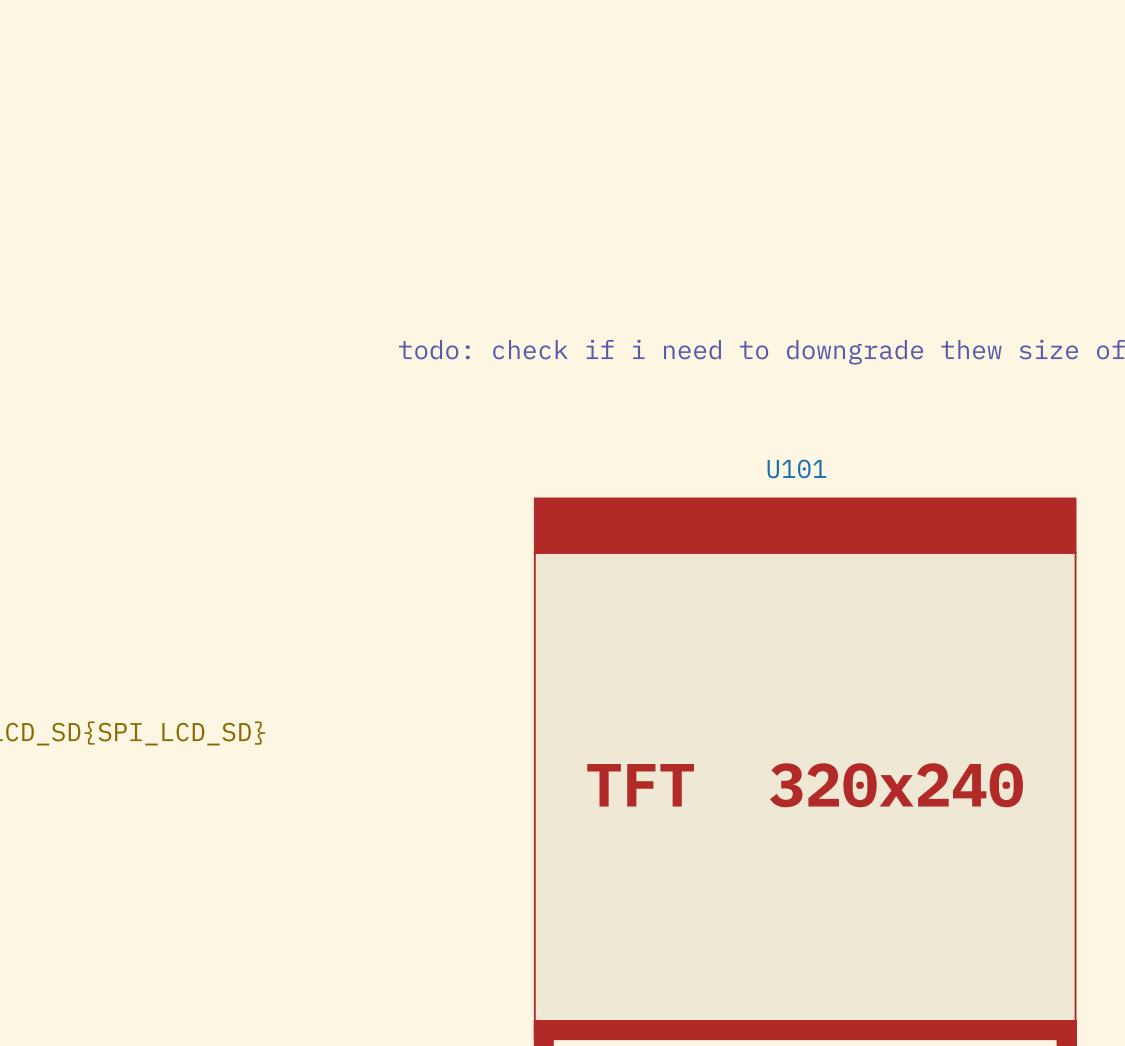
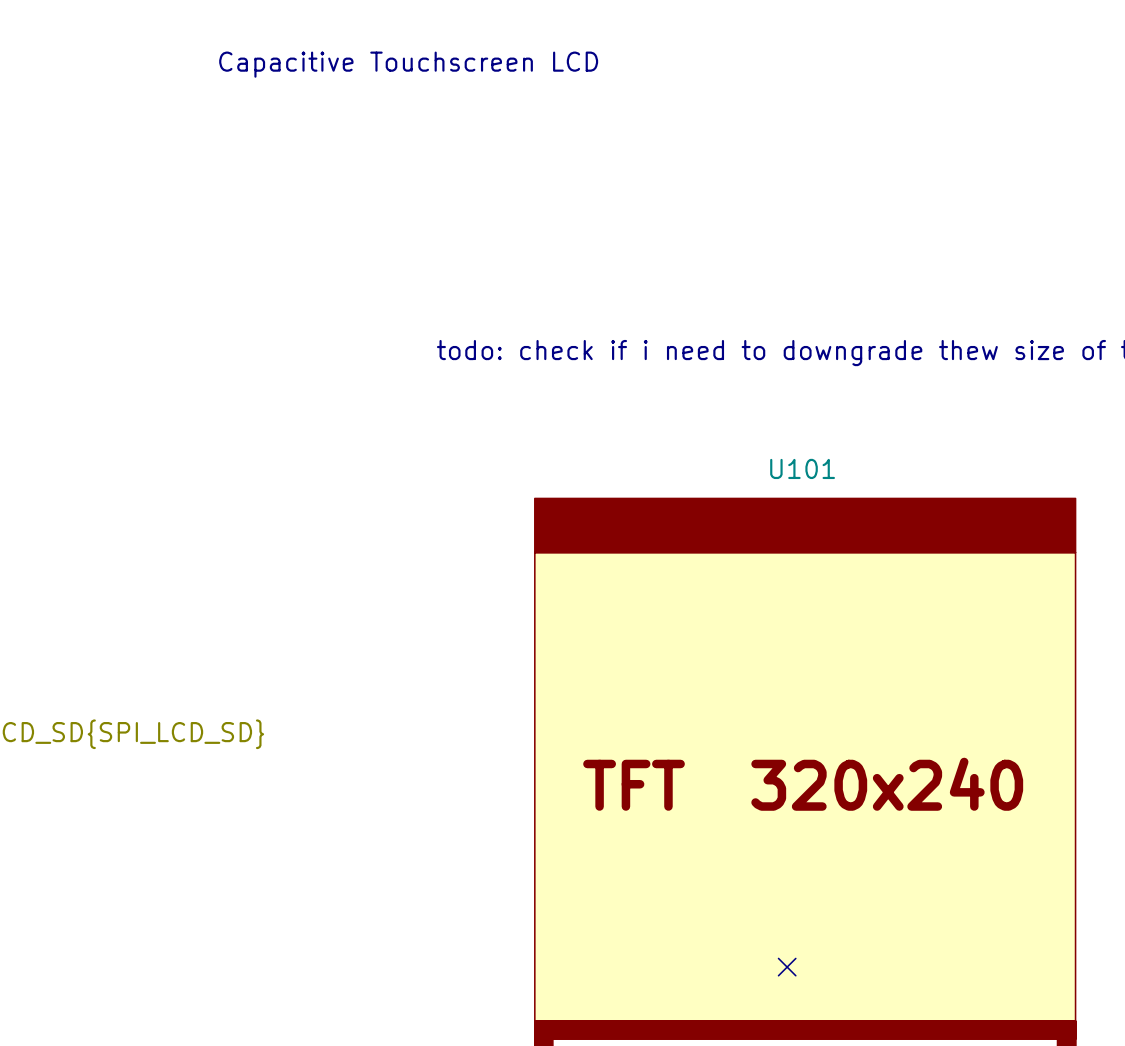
text: none -> Capacitive Touchscreen LCD (408, 64)
no-connect mark: none -> (787, 967)

